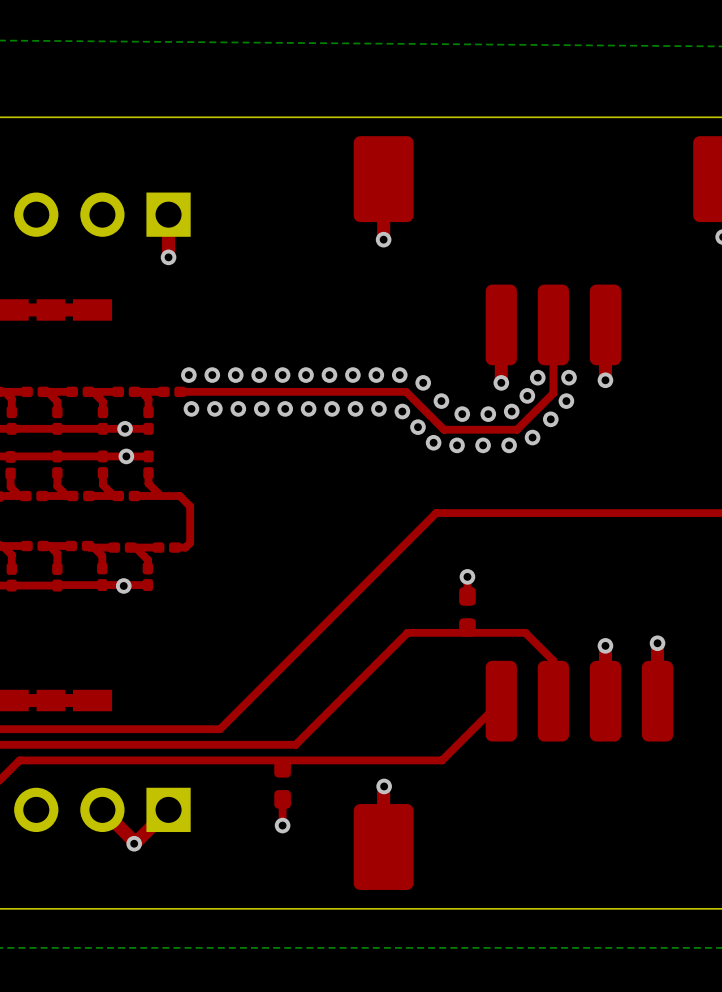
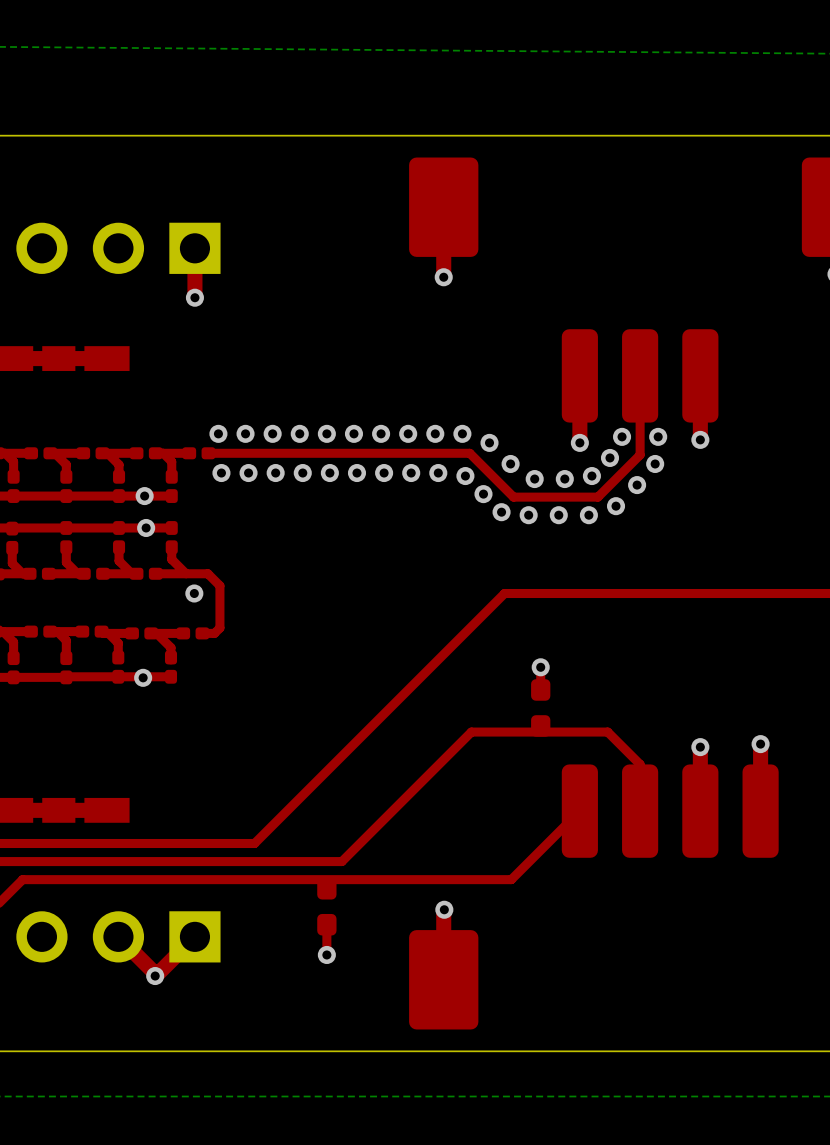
via: none -> (194, 593)

